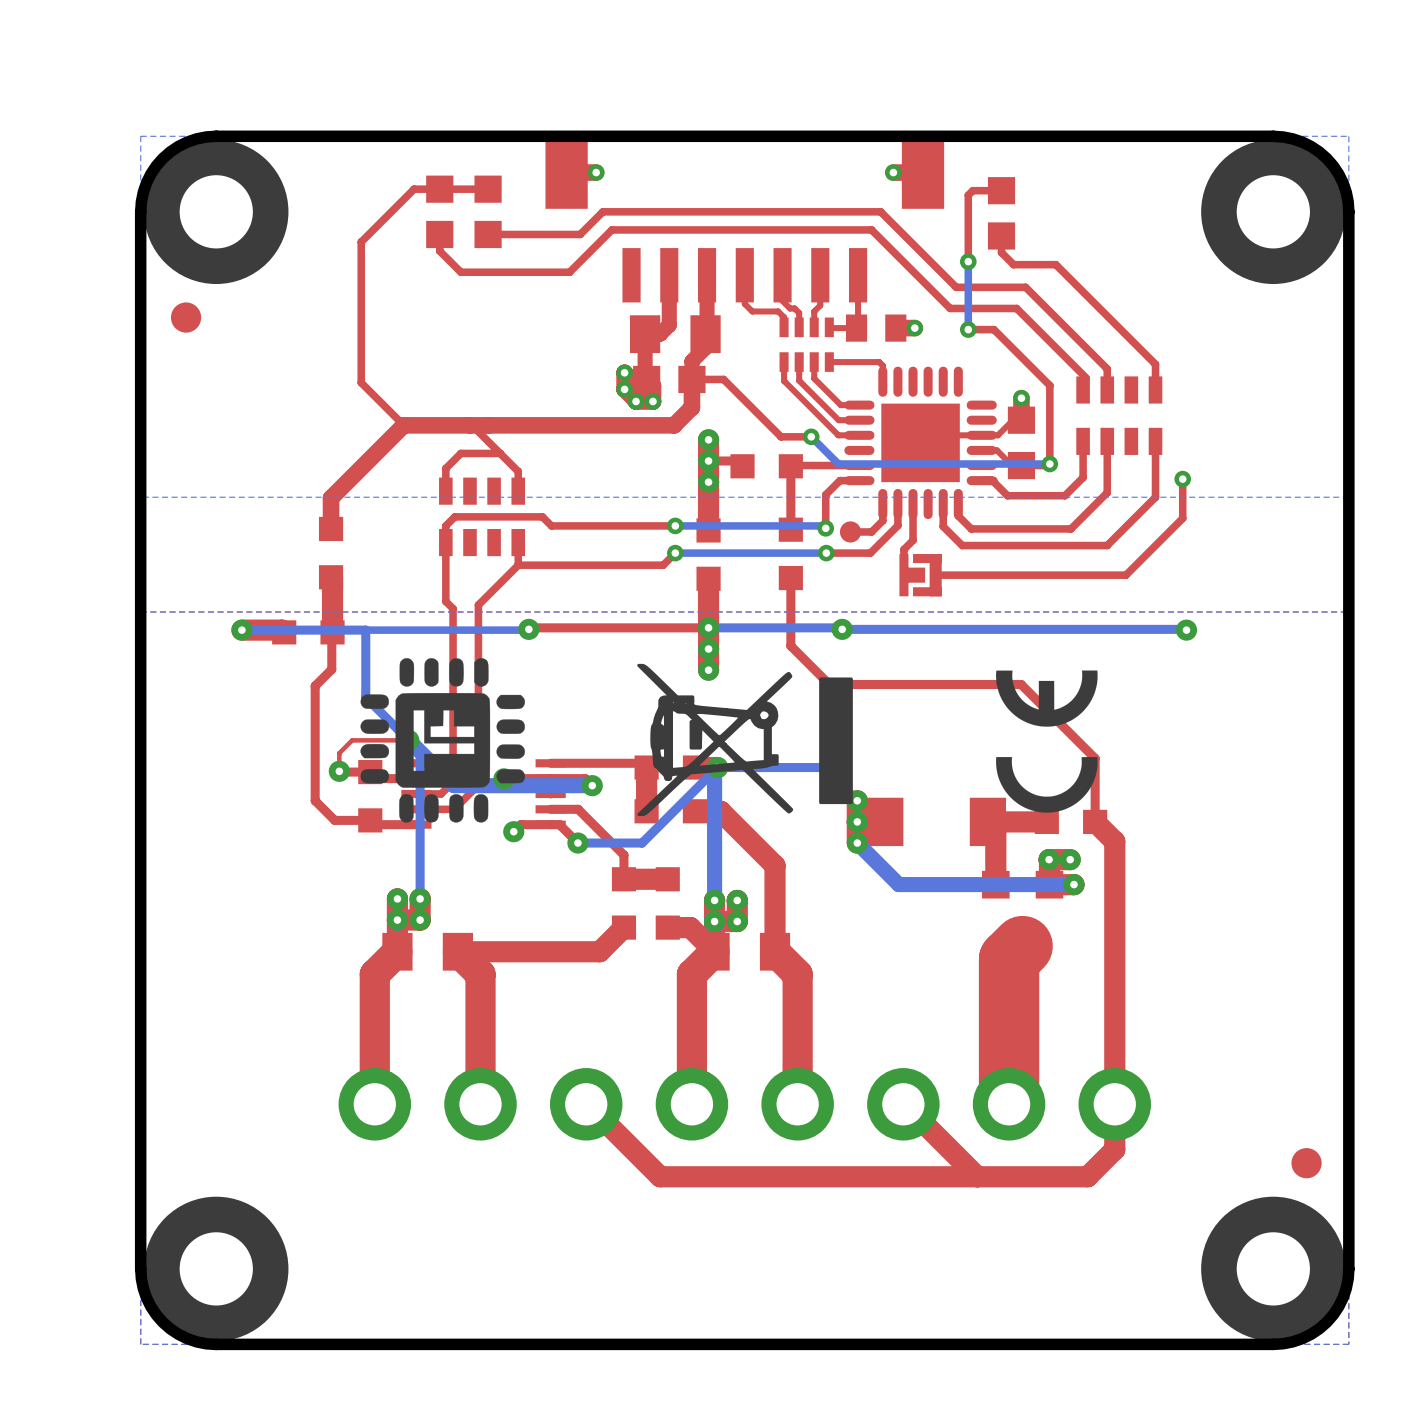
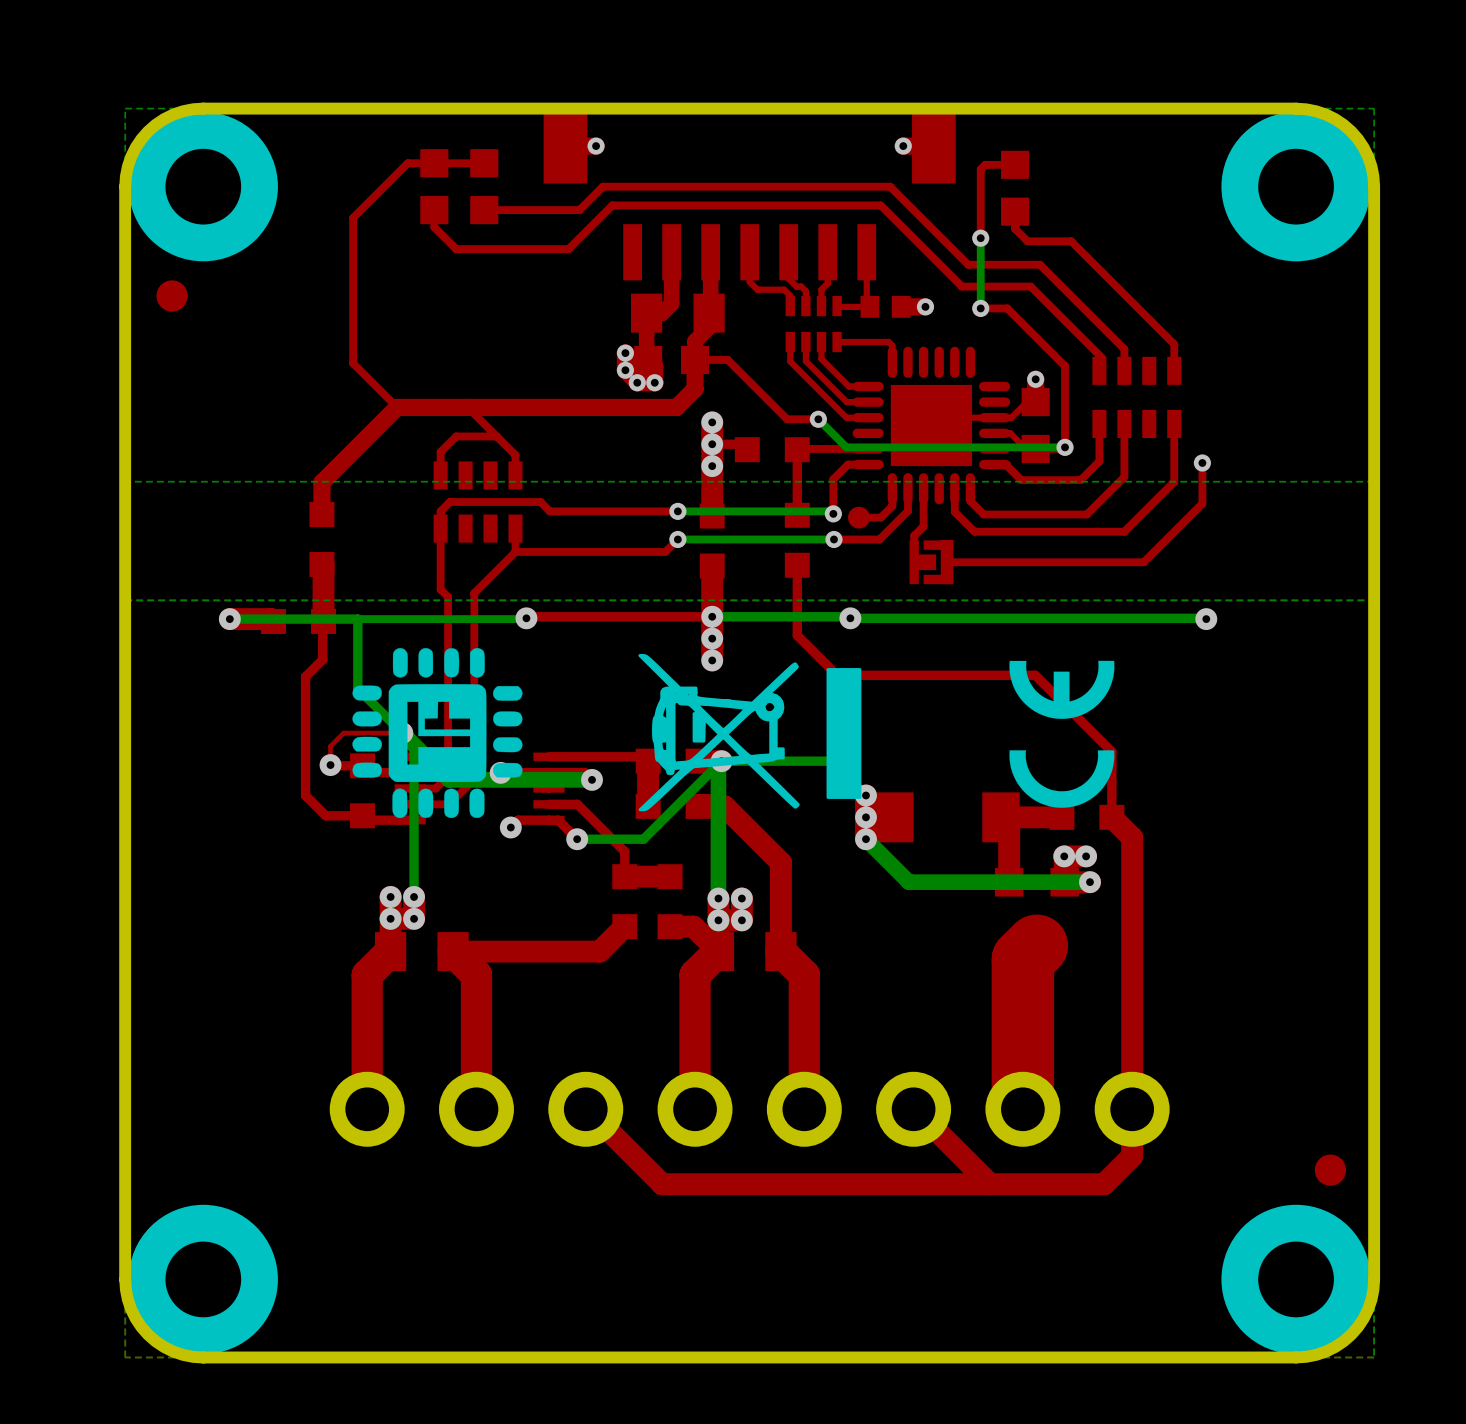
part footprint: [845, 314, 907, 342] -> [860, 295, 911, 318]

